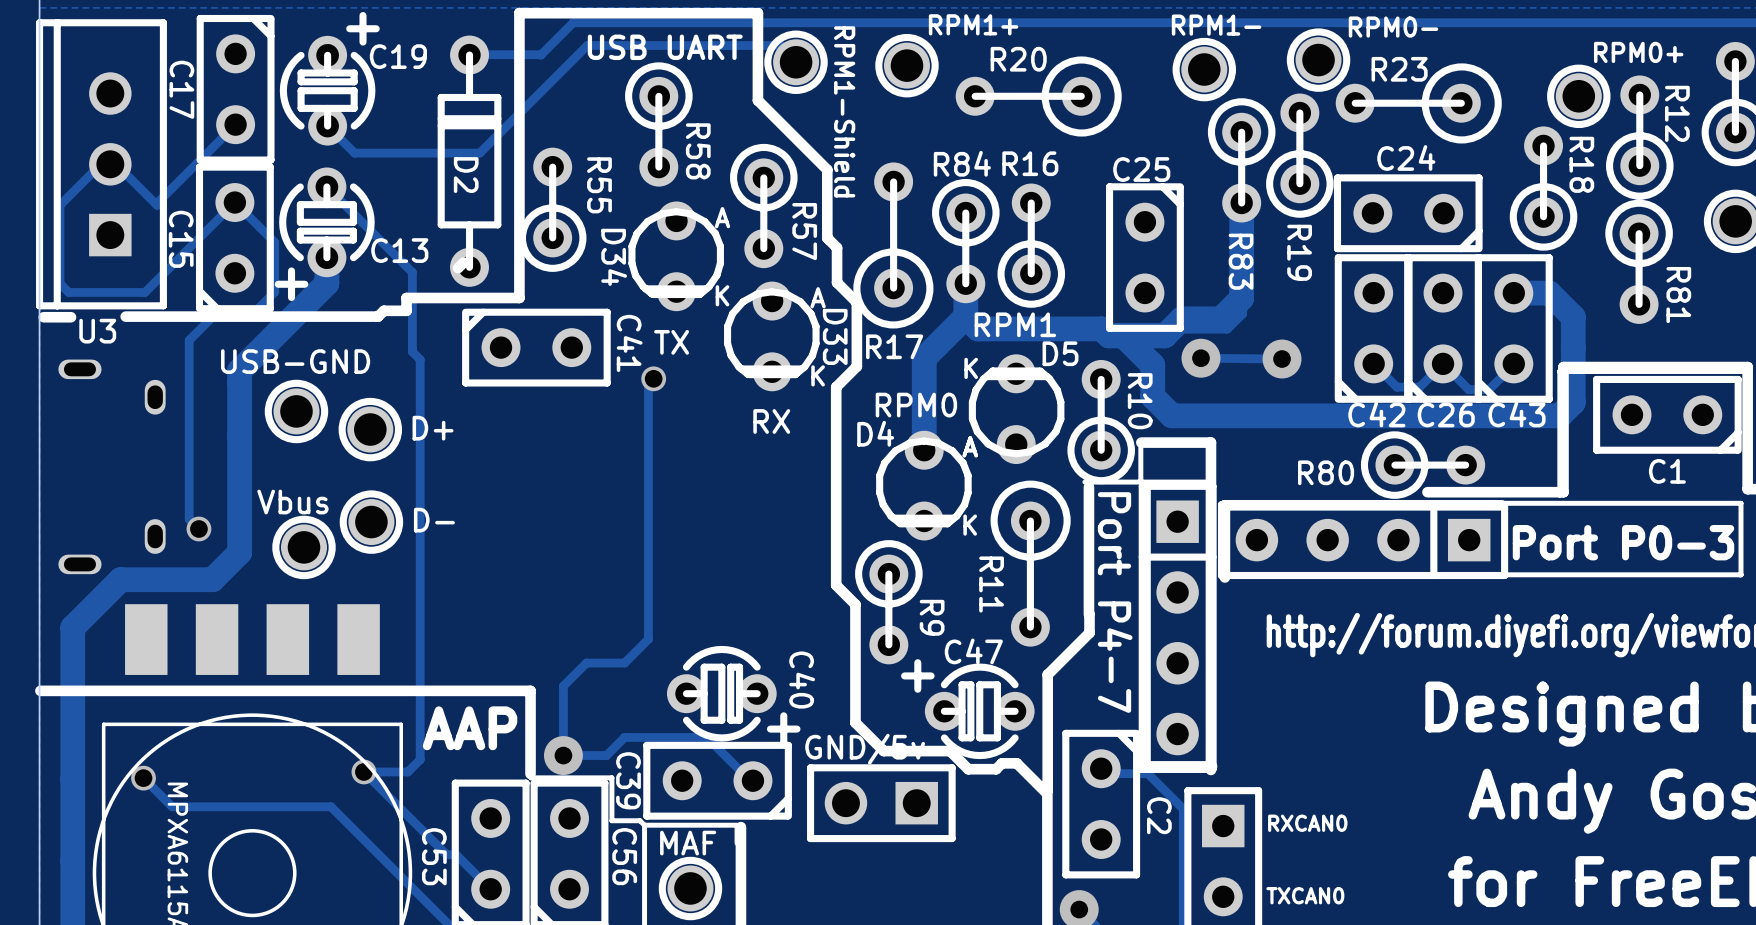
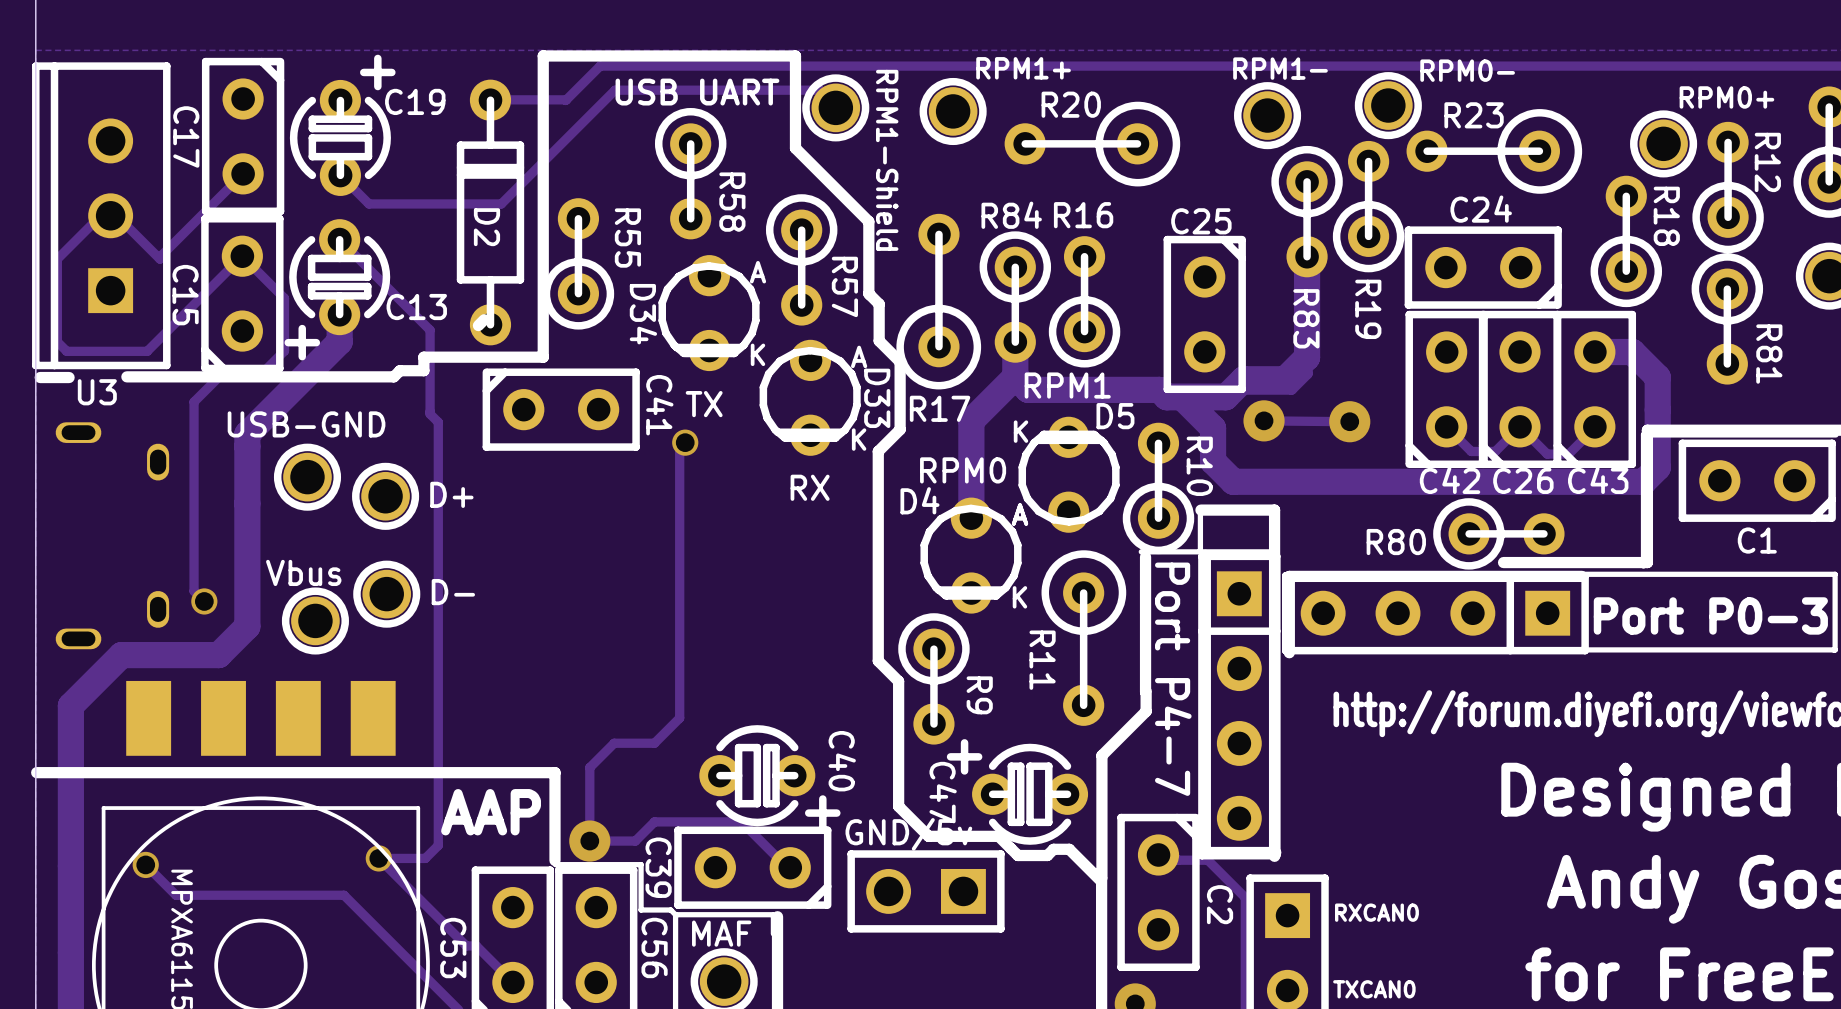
C47 name rotation: 0° (973, 651) -> 90° clockwise (943, 792)
C47 name position: C47 (973, 651) -> C47 (943, 792)

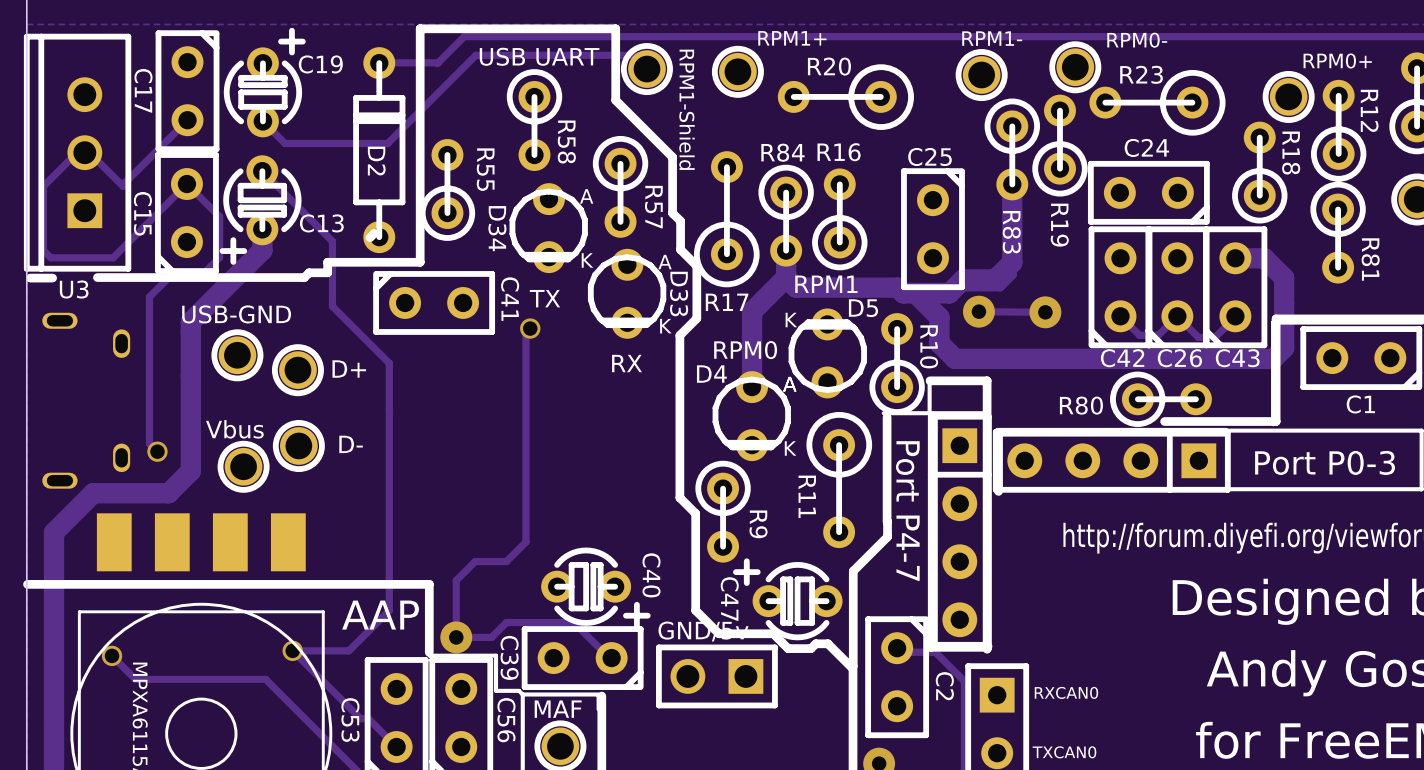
track: (438, 422) (438, 845) (425, 858) -> (338, 312) (389, 363) (389, 610) (348, 650) (328, 650)

